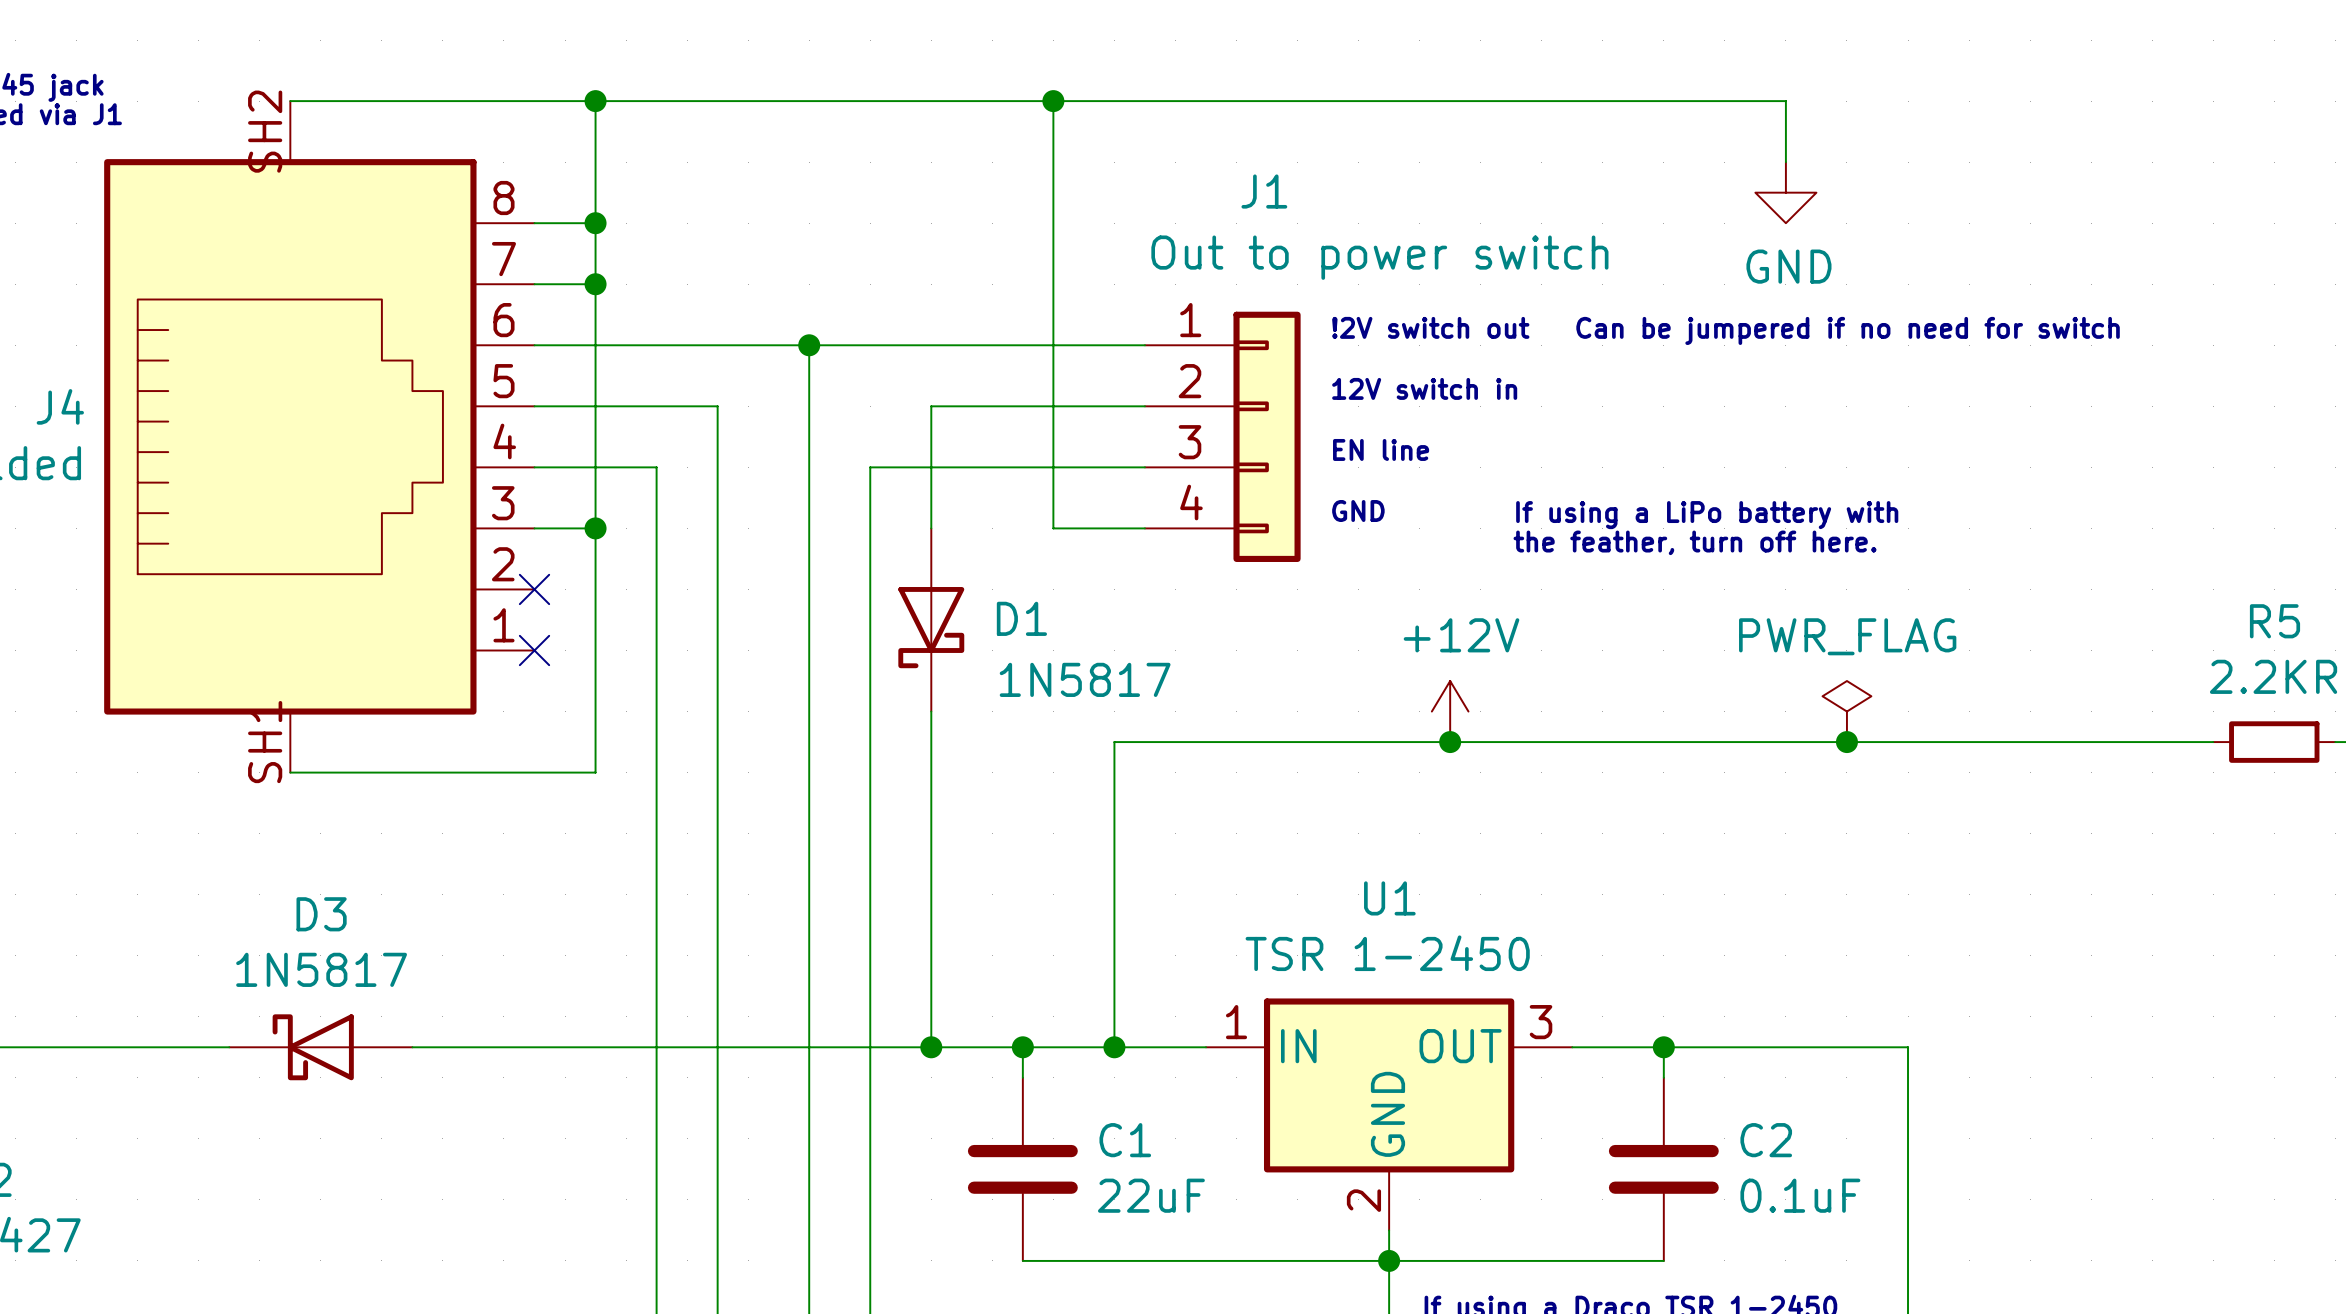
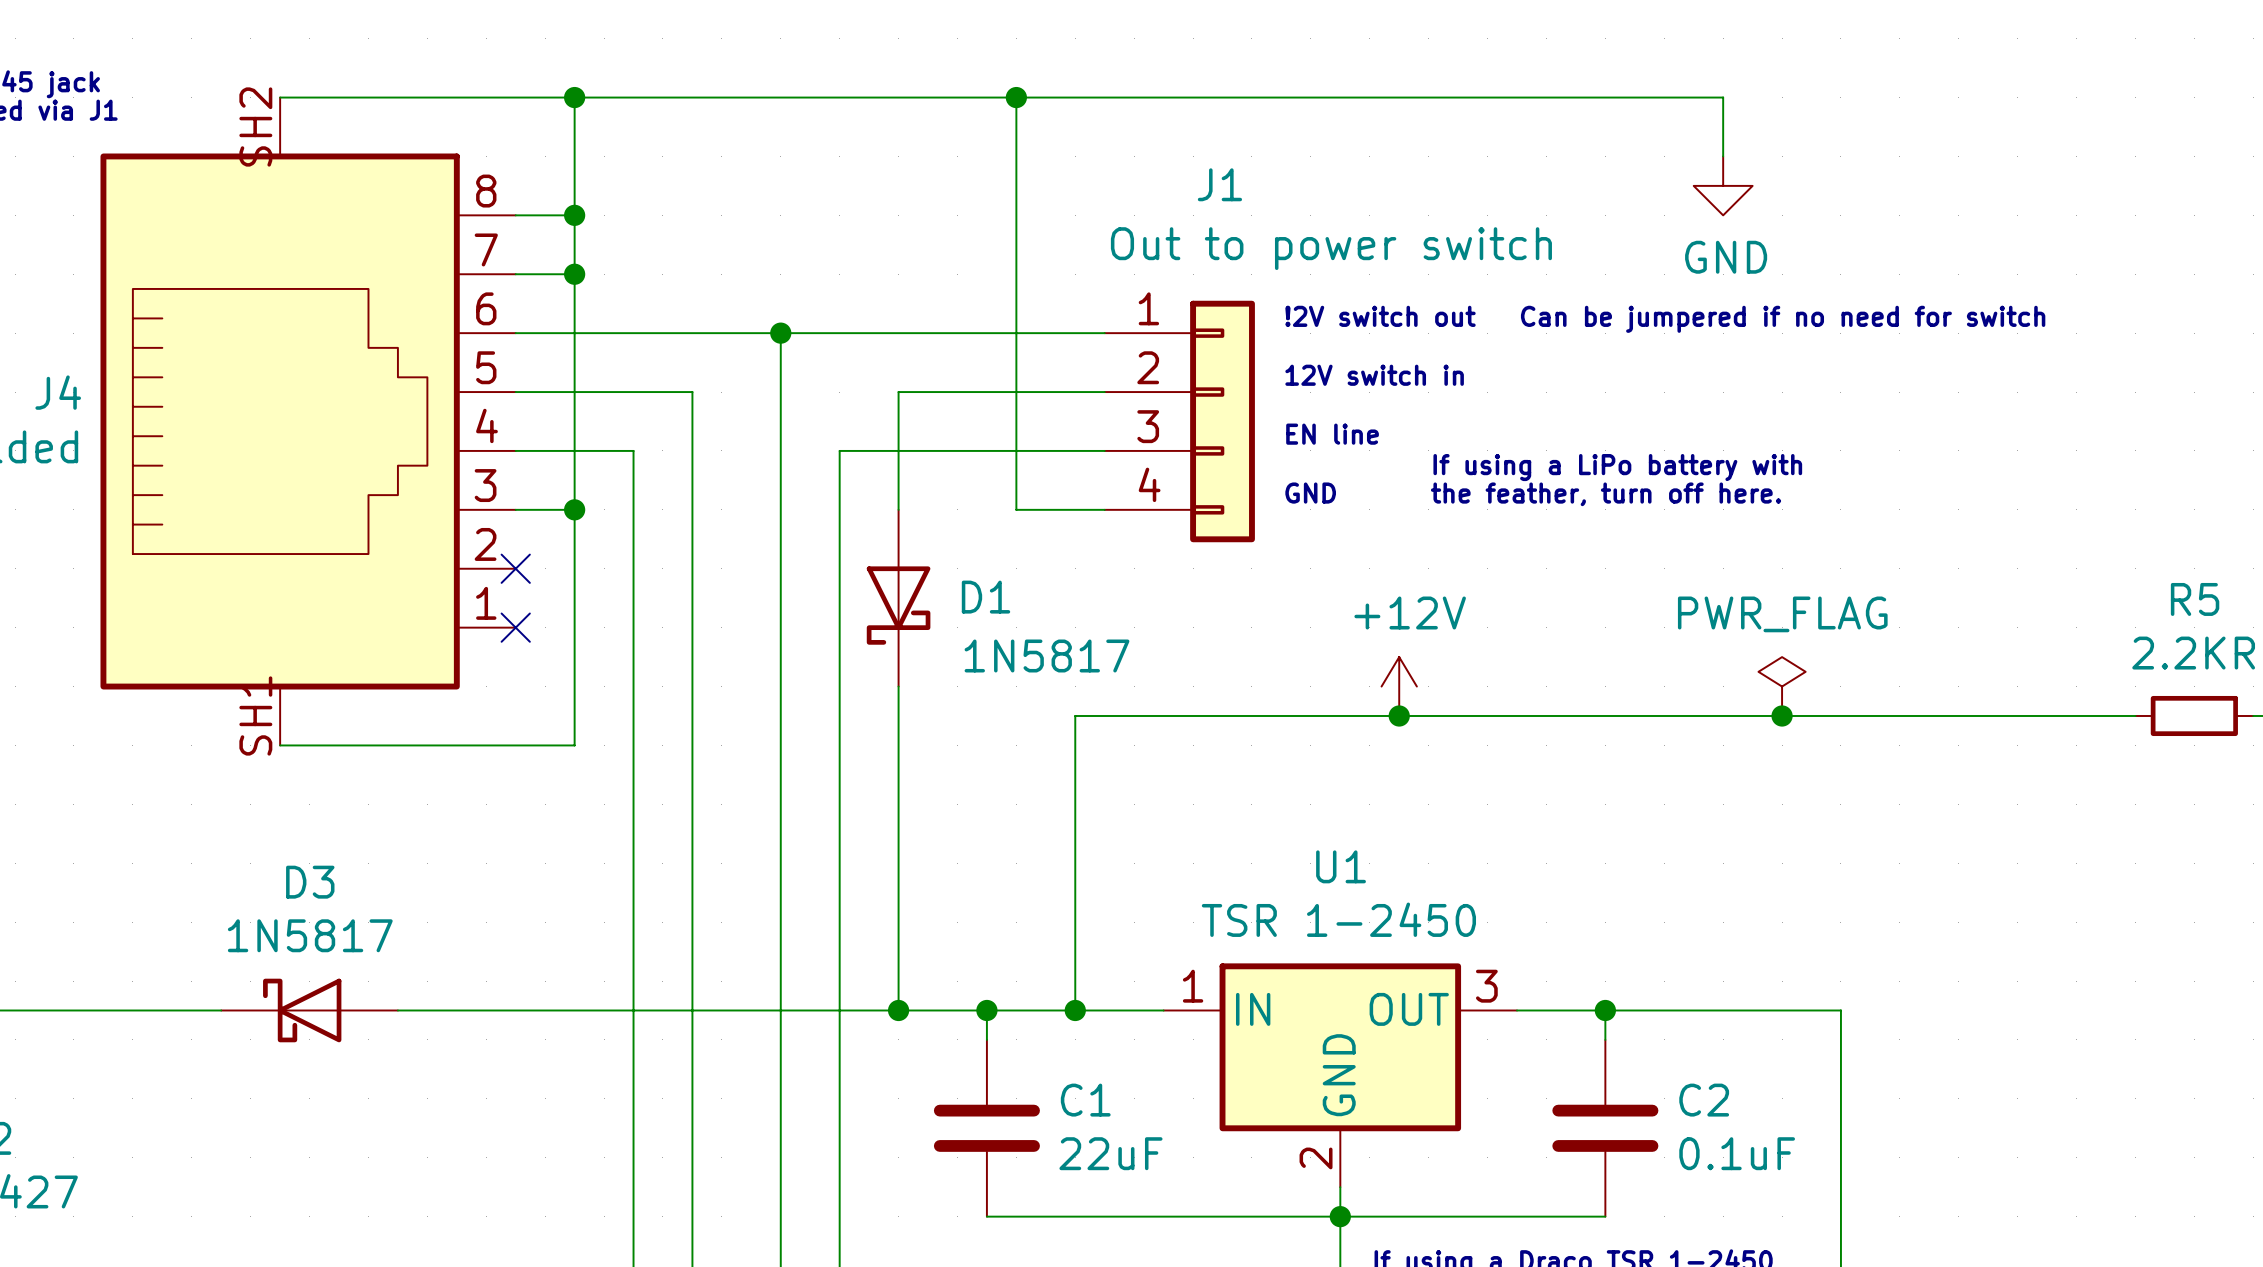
text position: If using a LiPo battery with (1707, 515) -> If using a LiPo battery with (1617, 467)
text position: the feather, turn off here. (1695, 542) -> the feather, turn off here. (1606, 494)

